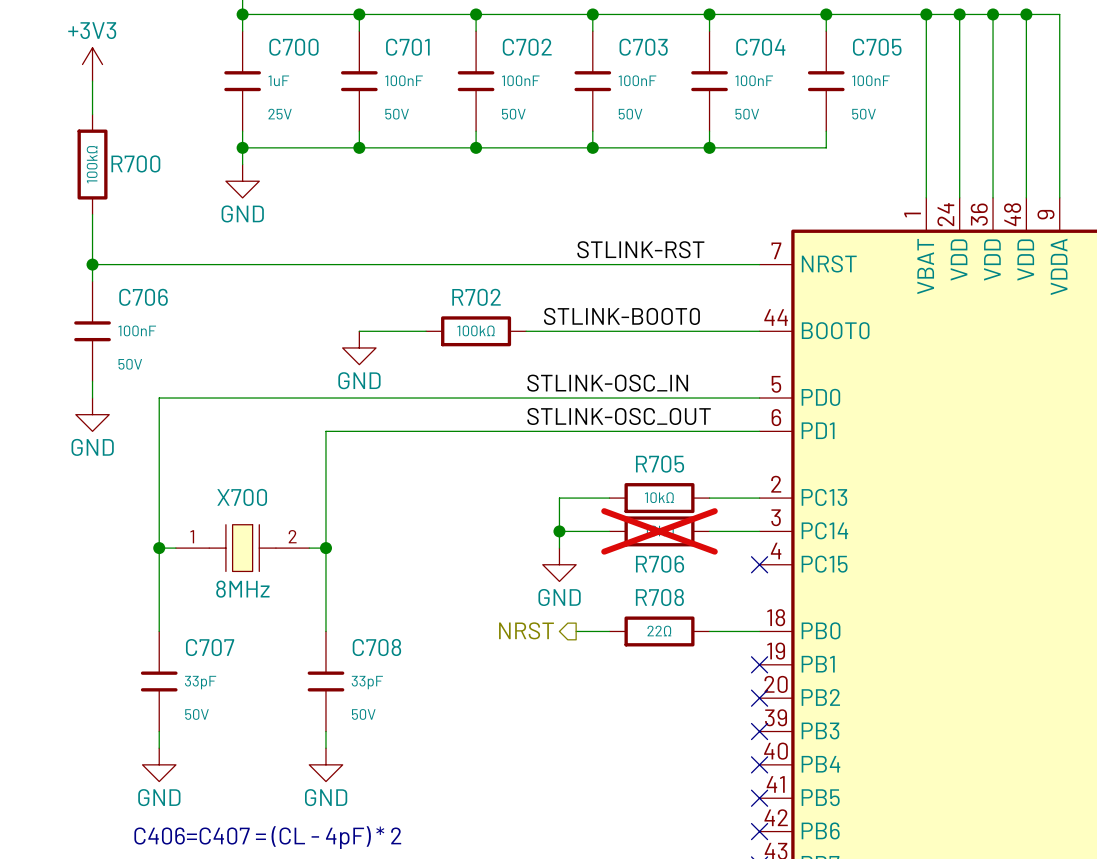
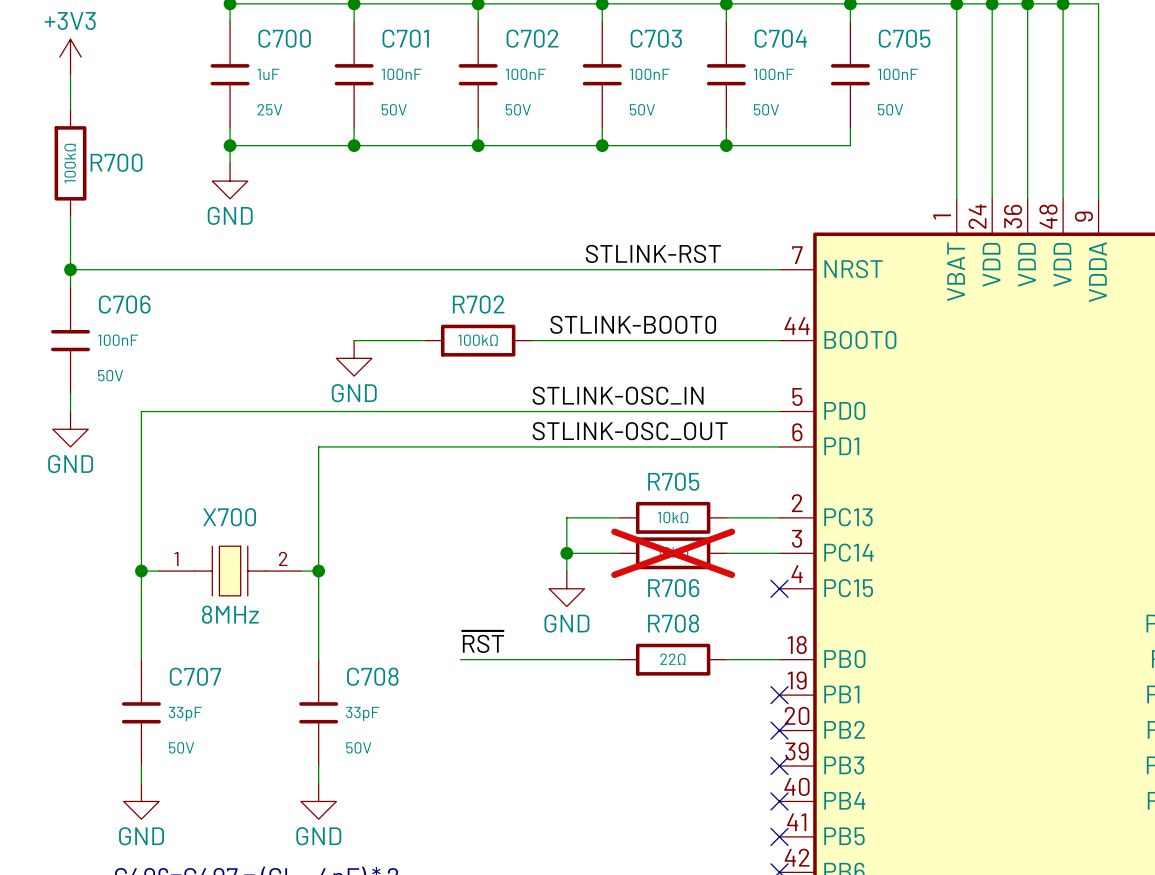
label: none -> ~{RST} (483, 641)
hierarchical label: NRST (526, 630) -> none
wire: none -> (460, 659) (584, 659)

